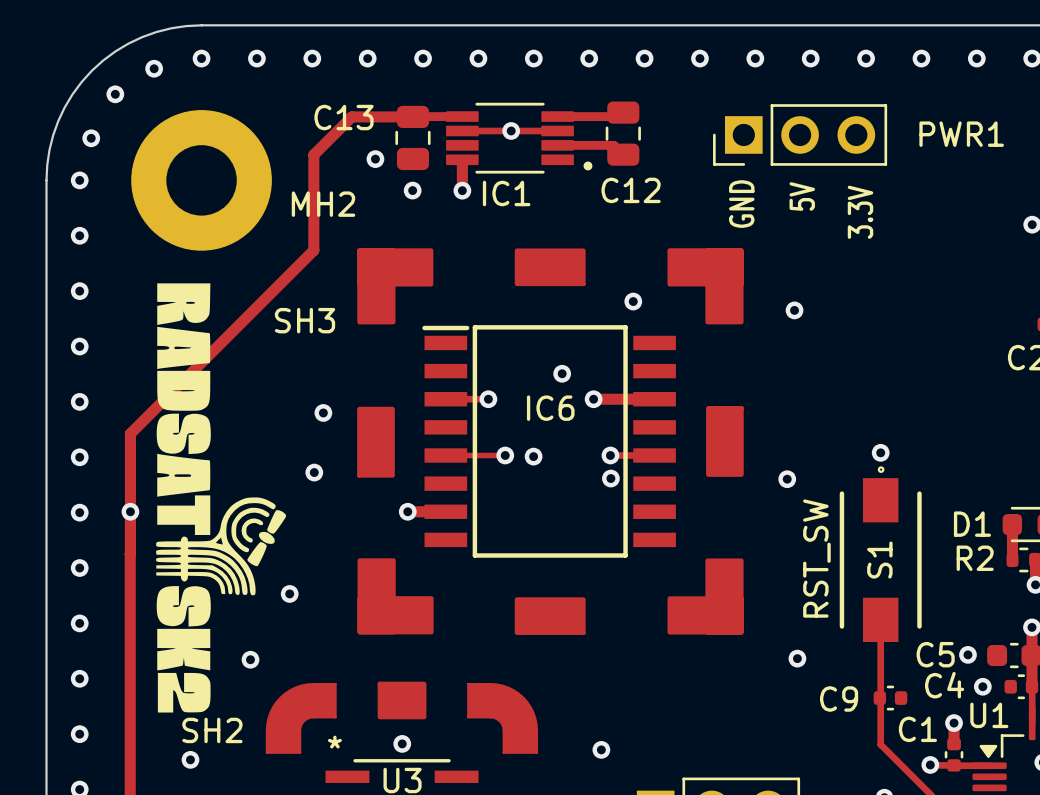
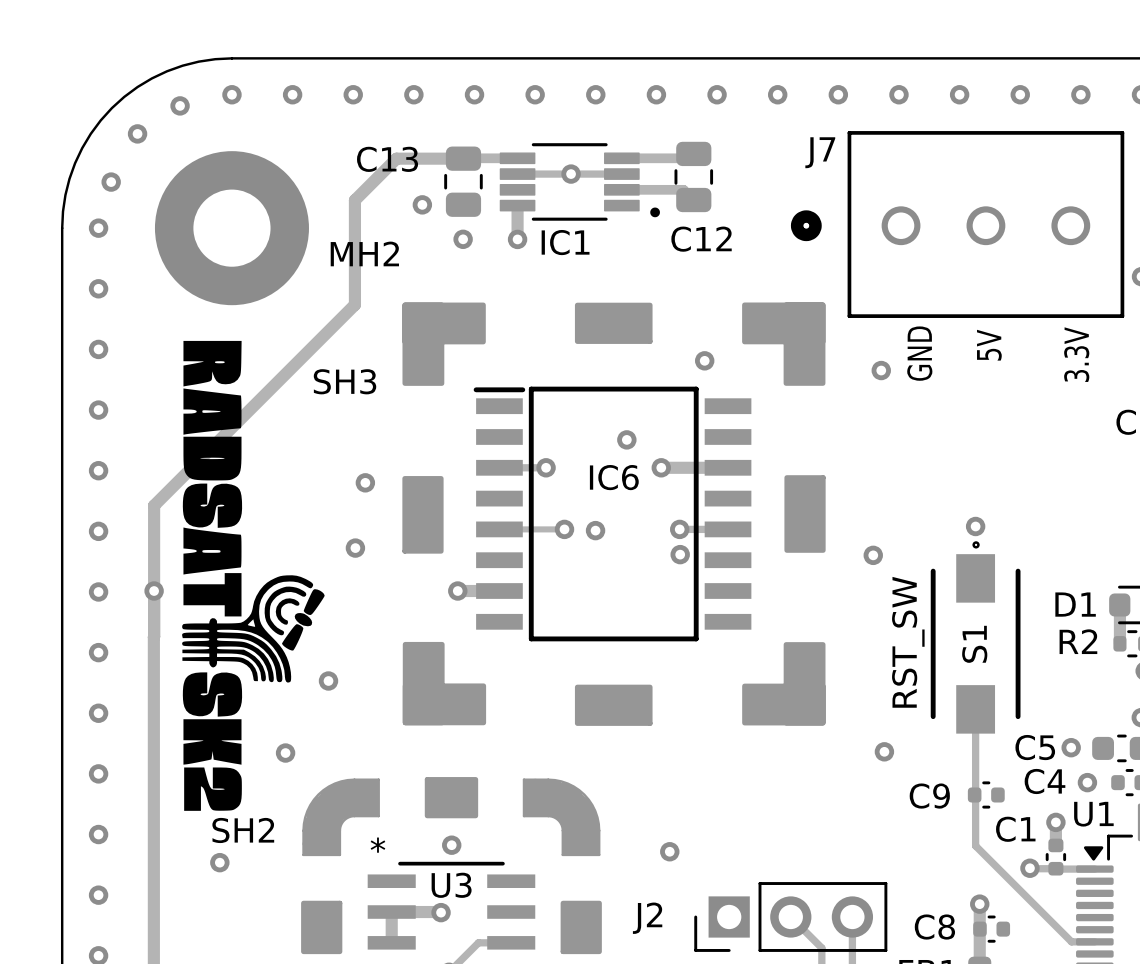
PWR1: (800, 134) -> none
J7: none -> (957, 224)
text position: 5V (802, 196) -> 5V (989, 345)
text position: GND (741, 204) -> GND (919, 353)
text position: 3.3V (860, 212) -> 3.3V (1076, 354)

